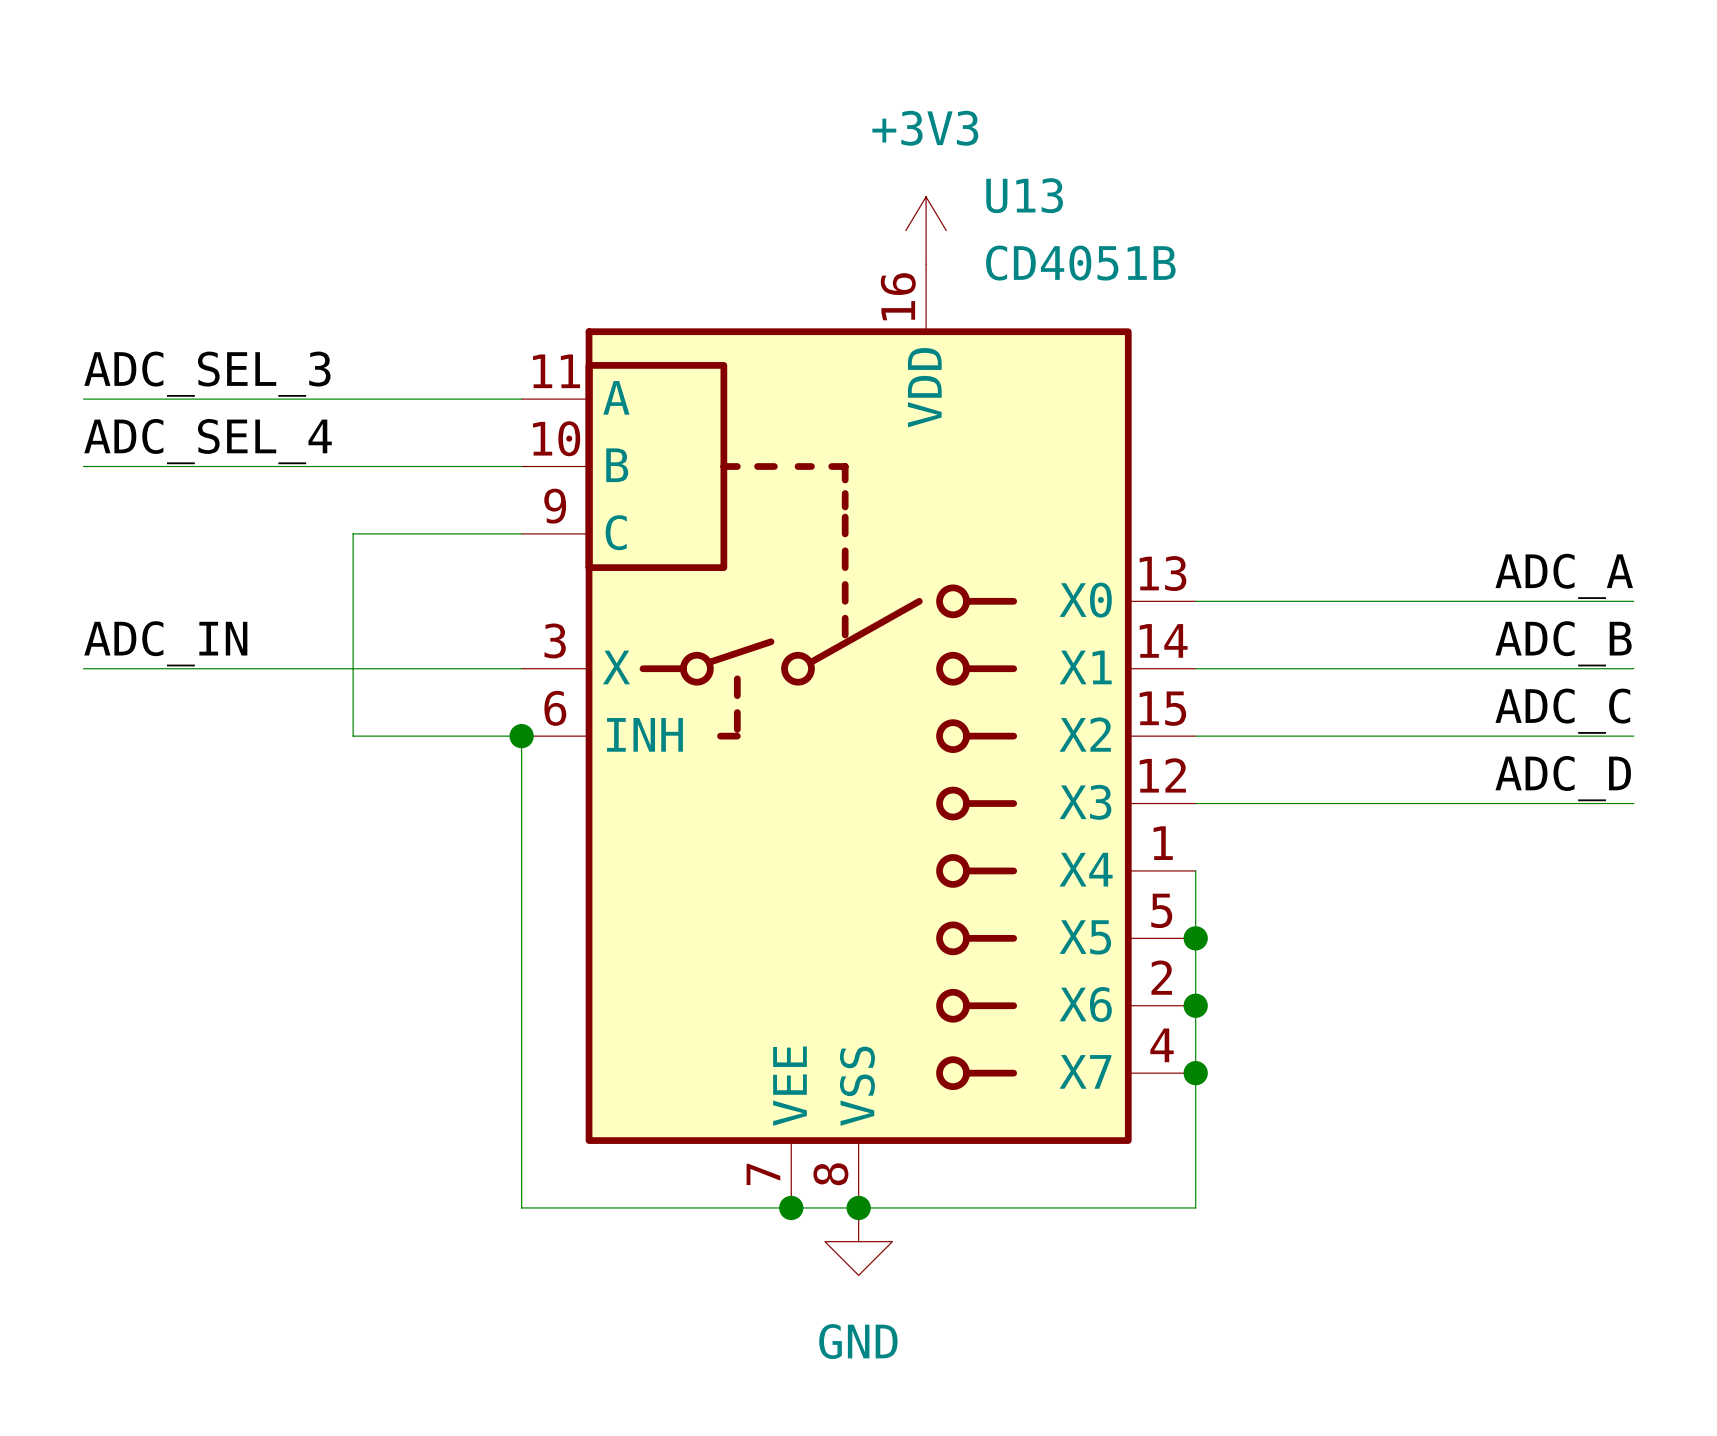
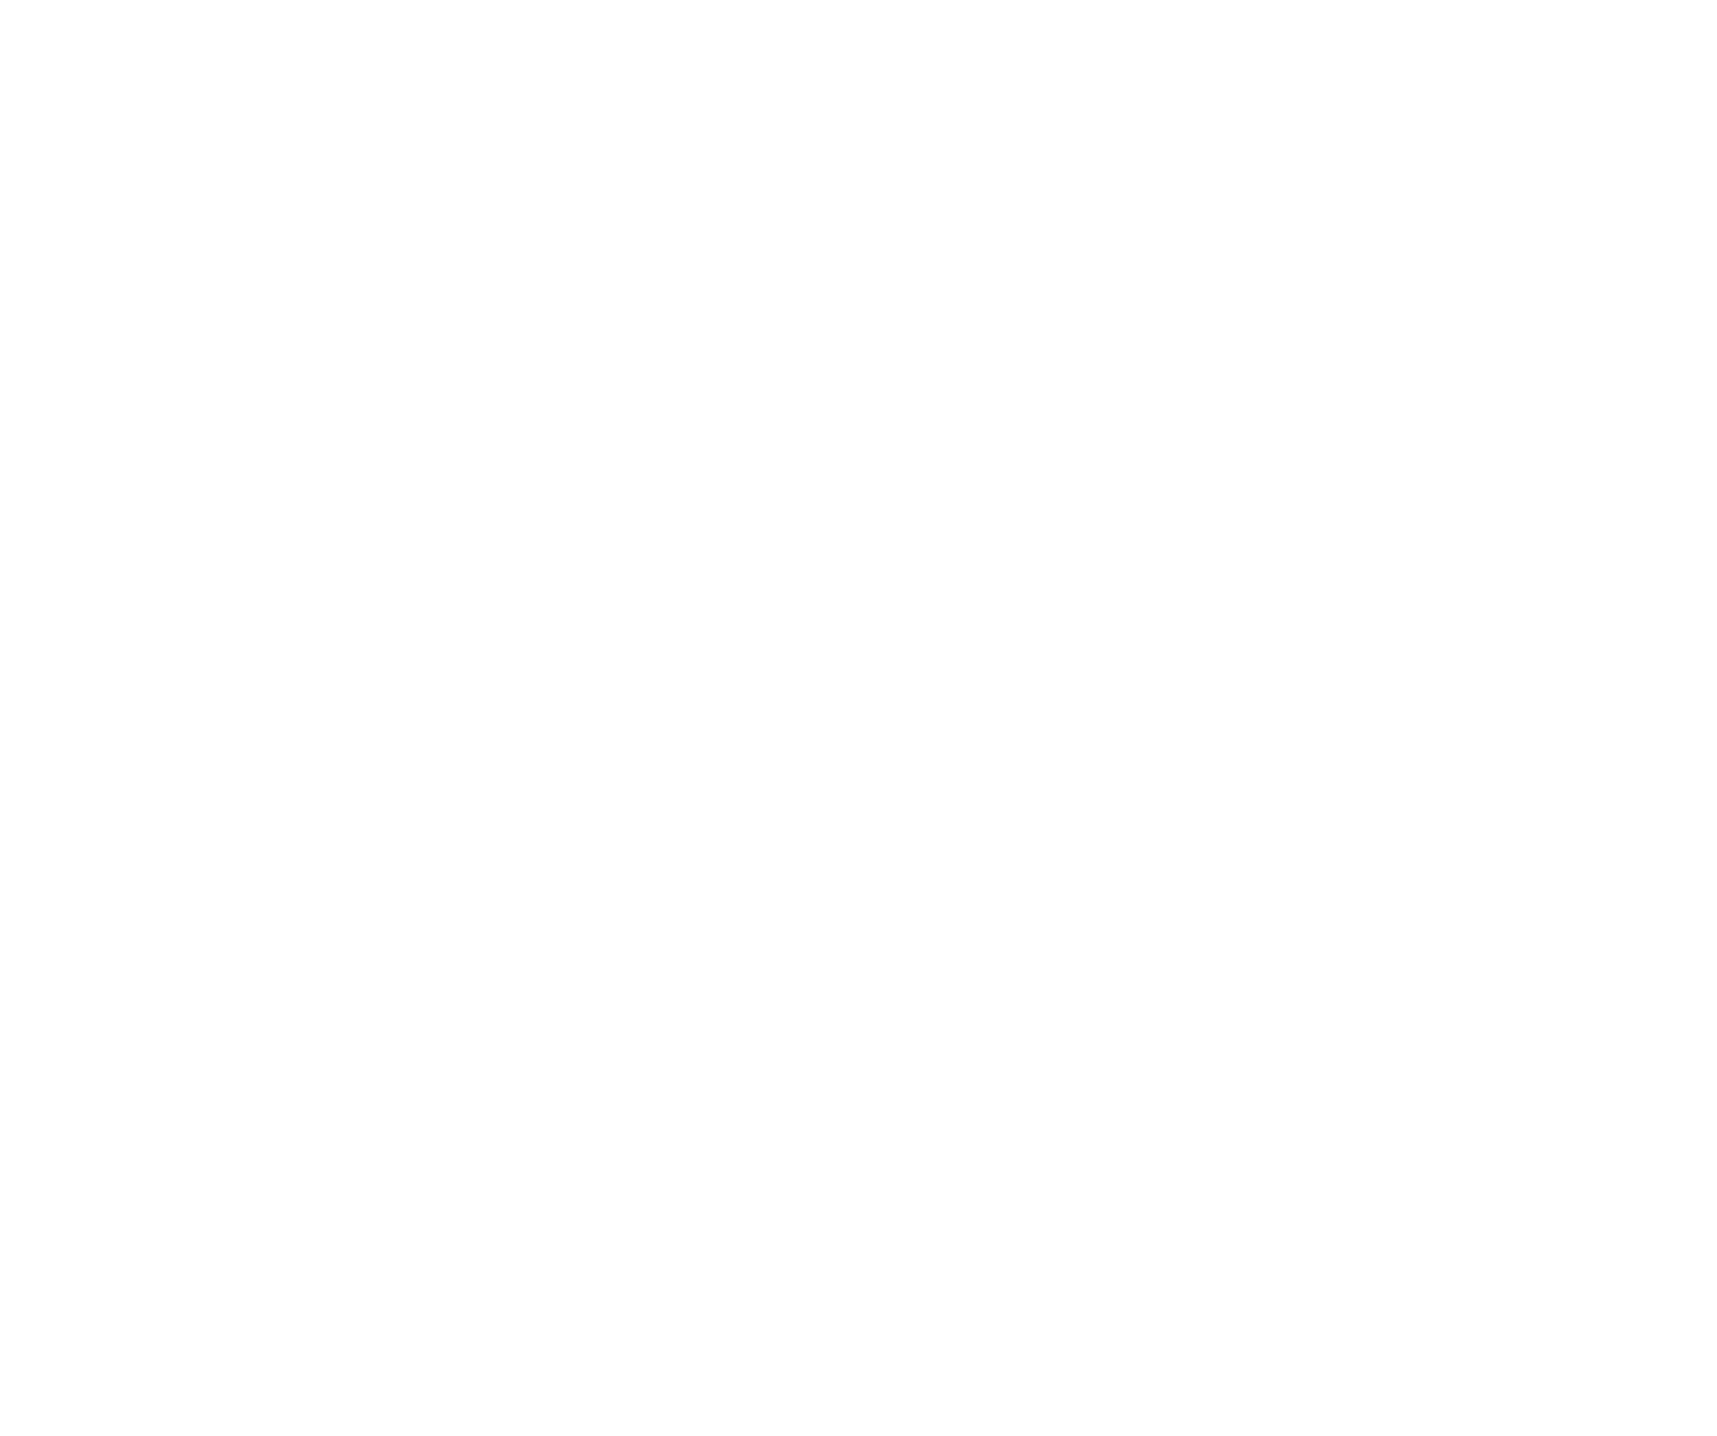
power symbol: +3V3 (926, 230) -> none
label: ADC_SEL_3 (207, 374) -> none
wire: (83, 399) (521, 399) -> none
label: ADC_SEL_4 (208, 441) -> none
wire: (83, 466) (521, 466) -> none
wire: (521, 533) (353, 533) (353, 736) (521, 736) (521, 1207) (1195, 1207) (1195, 870) -> none
label: ADC_A (1564, 576) -> none
wire: (1195, 601) (1633, 601) -> none
label: ADC_IN (165, 643) -> none
label: ADC_B (1563, 643) -> none
wire: (83, 668) (521, 668) -> none
wire: (1195, 668) (1633, 668) -> none
label: ADC_C (1562, 711) -> none
junction: (521, 736) -> none
U13: CD4051B (858, 736) -> none
wire: (1195, 736) (1633, 736) -> none
label: ADC_D (1563, 778) -> none
wire: (1195, 803) (1633, 803) -> none
junction: (1195, 938) -> none
junction: (1195, 1005) -> none
junction: (1195, 1073) -> none
junction: (791, 1207) -> none
junction: (858, 1207) -> none
power symbol: GND (858, 1241) -> none

